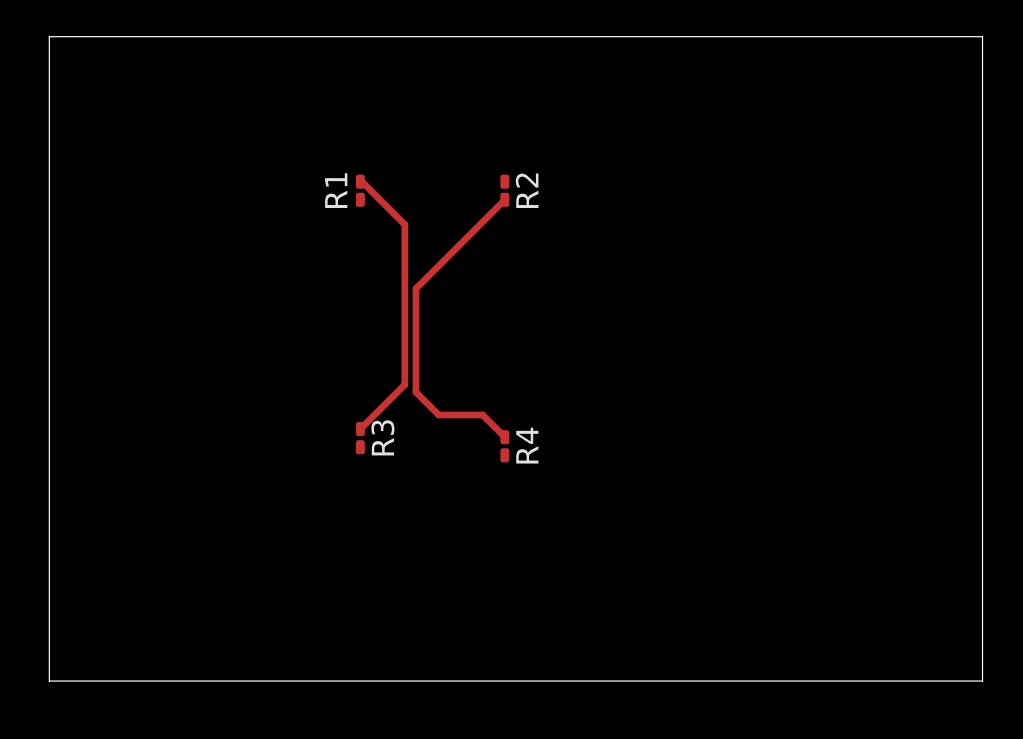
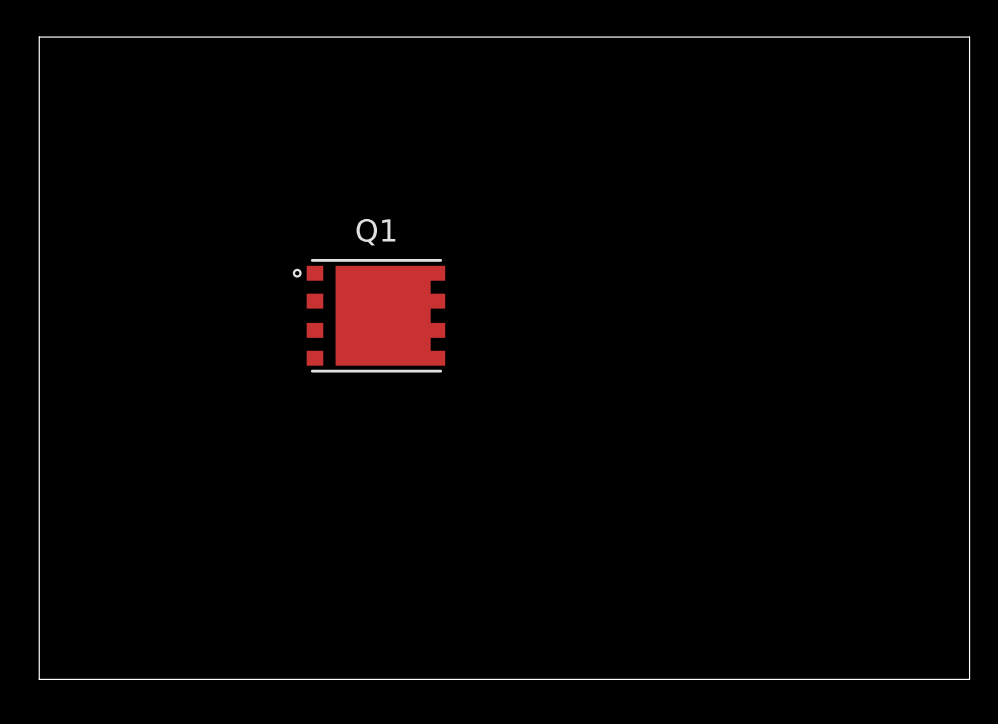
track: (360, 181) (404, 224) (404, 384) (360, 429) -> none
R1: (360, 190) -> none
R2: (504, 190) -> none
track: (504, 199) (415, 288) (415, 392) (438, 414) (482, 414) (504, 437) -> none
Q1: none -> (369, 315)
R3: (360, 438) -> none
R4: (504, 446) -> none

